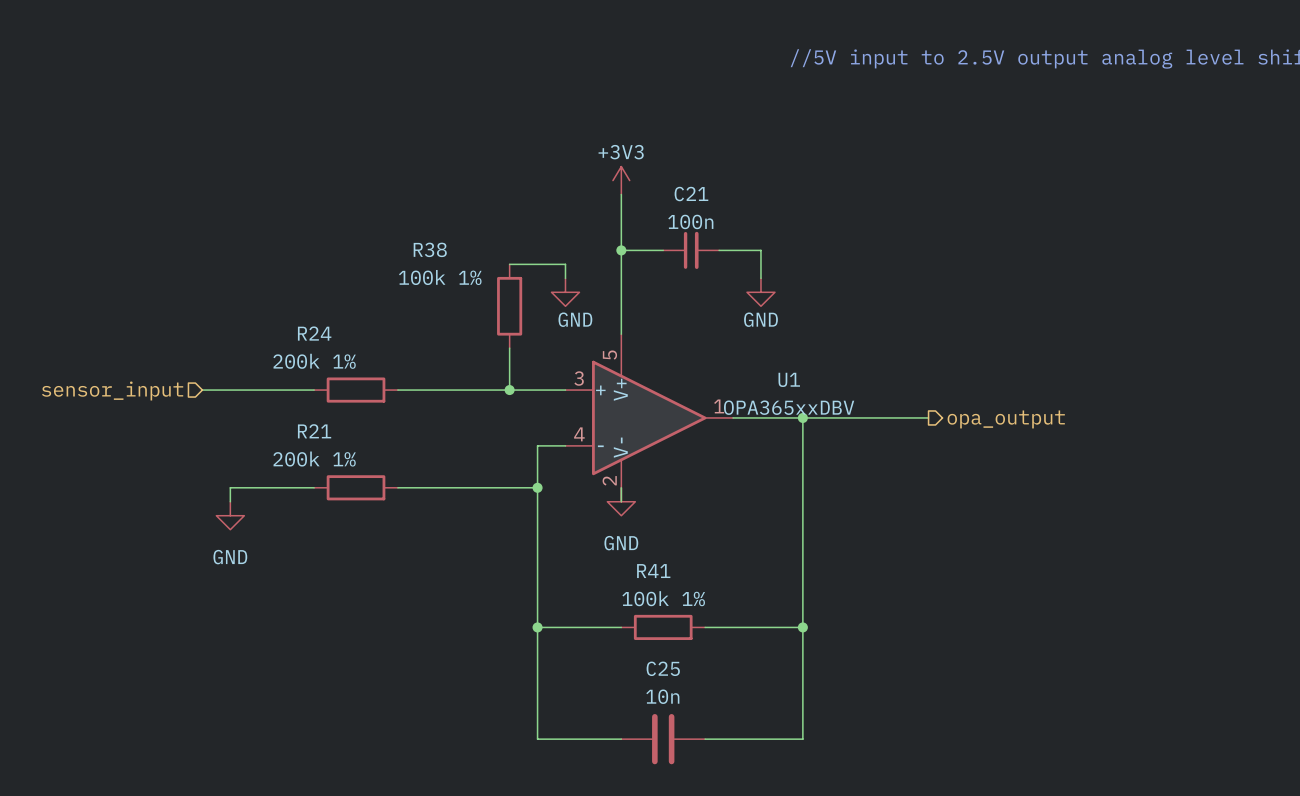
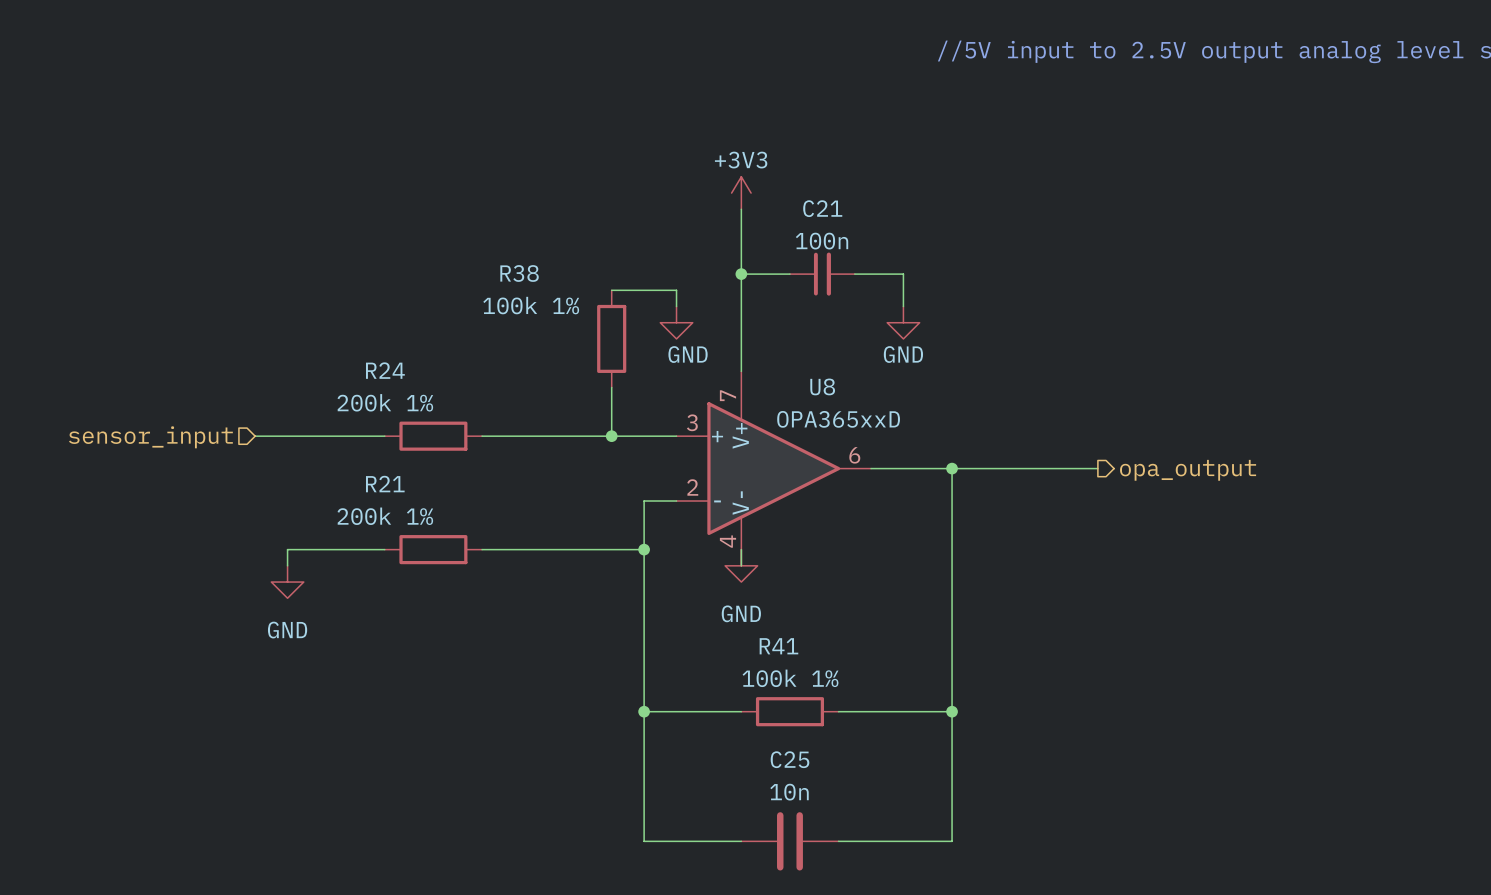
U1 pin number: 5 (609, 355) -> 7 (727, 395)
U1 name: U1 (789, 379) -> U8 (822, 386)
U1 pin number: 1 (719, 406) -> 6 (854, 455)
U1 value: OPA365xxDBV (789, 407) -> OPA365xxD (838, 419)
U1 pin number: 4 (579, 434) -> 2 (692, 487)
U1 pin number: 2 (609, 480) -> 4 (727, 541)

